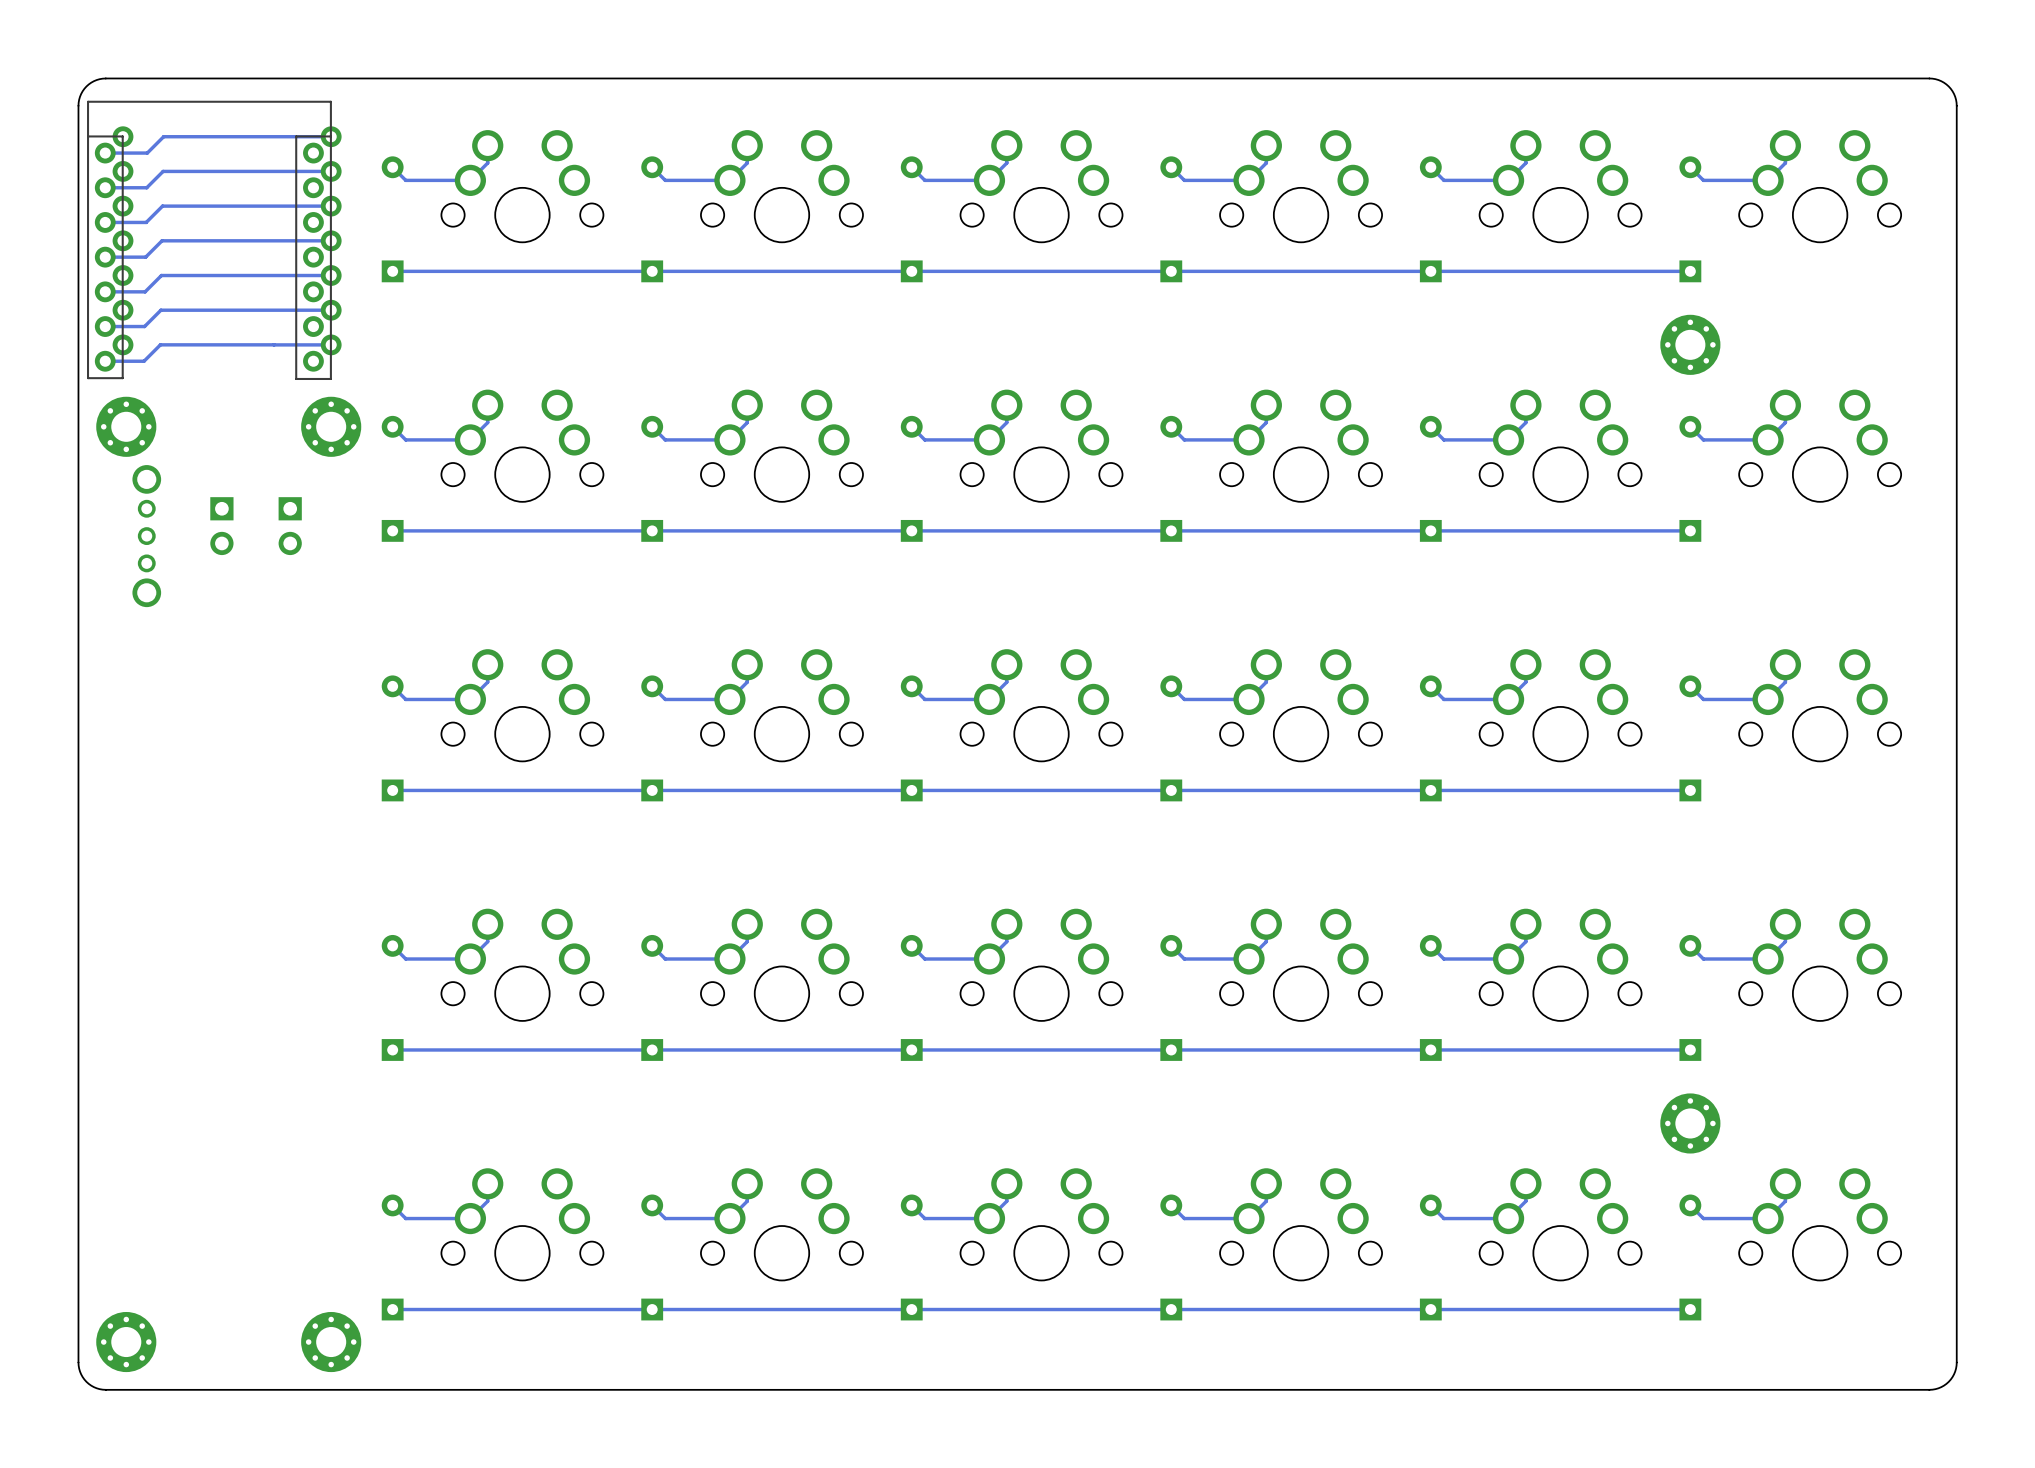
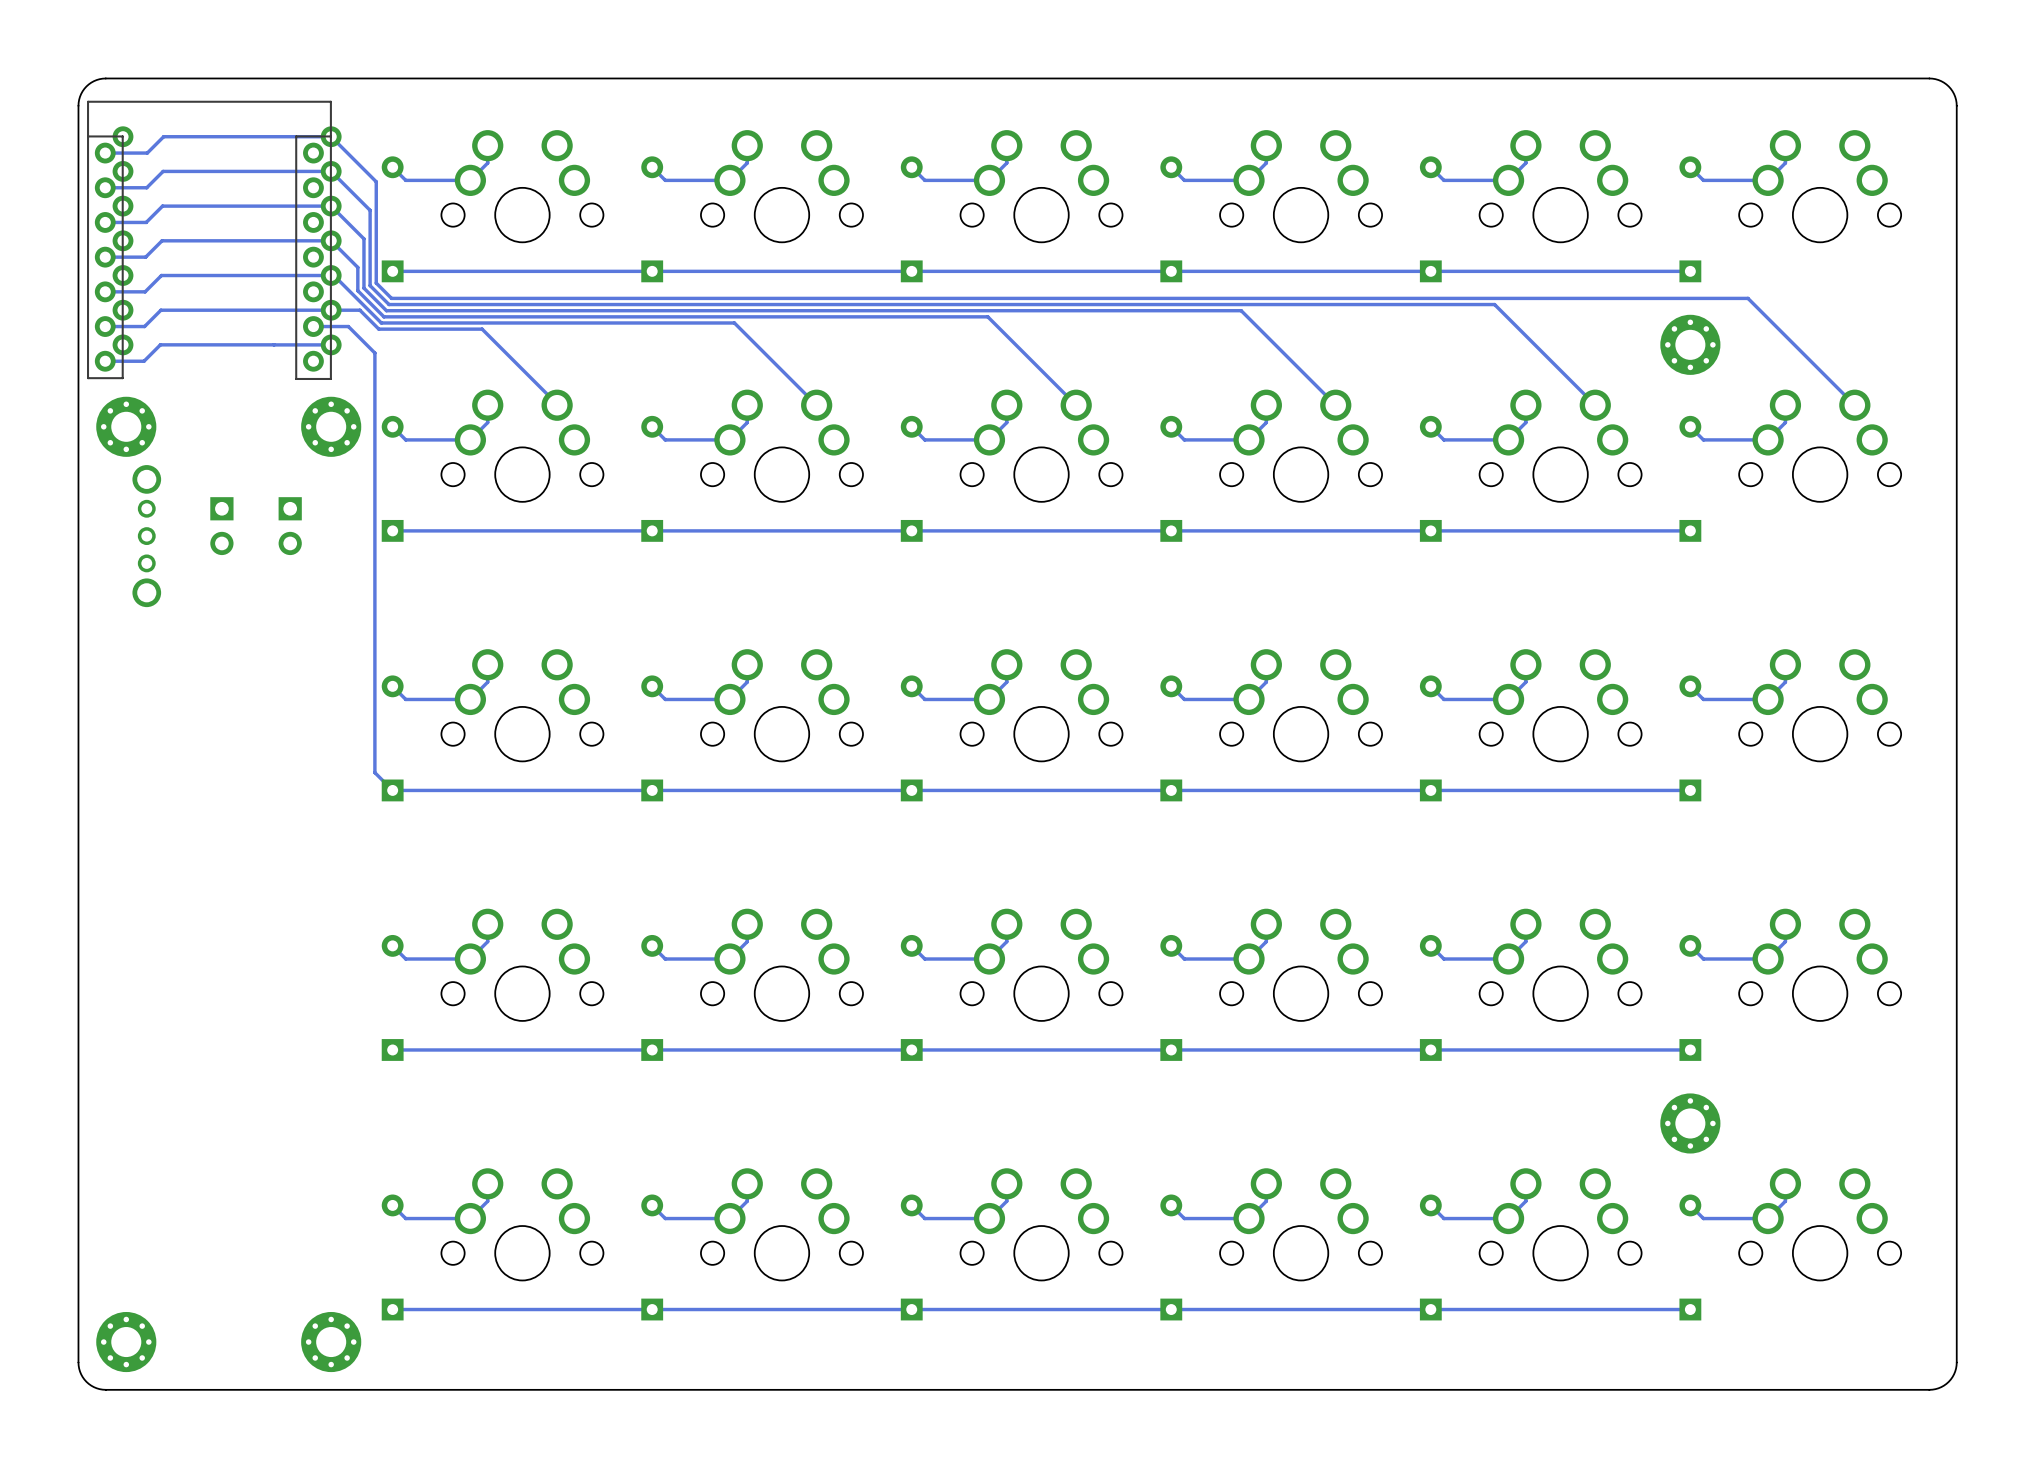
track: none -> (331, 136) (376, 181) (376, 283) (391, 298) (1748, 298) (1854, 405)
track: none -> (331, 171) (370, 210) (370, 285) (389, 304) (1494, 304) (1595, 405)
track: none -> (331, 206) (363, 238) (363, 288) (386, 310) (1241, 310) (1335, 405)
track: none -> (331, 240) (357, 267) (357, 290) (383, 316) (987, 316) (1076, 405)
track: none -> (331, 275) (333, 275) (381, 322) (734, 322) (816, 405)
track: none -> (331, 310) (359, 310) (378, 329) (482, 329) (557, 405)
track: none -> (313, 326) (348, 326) (374, 353) (374, 772) (392, 790)

